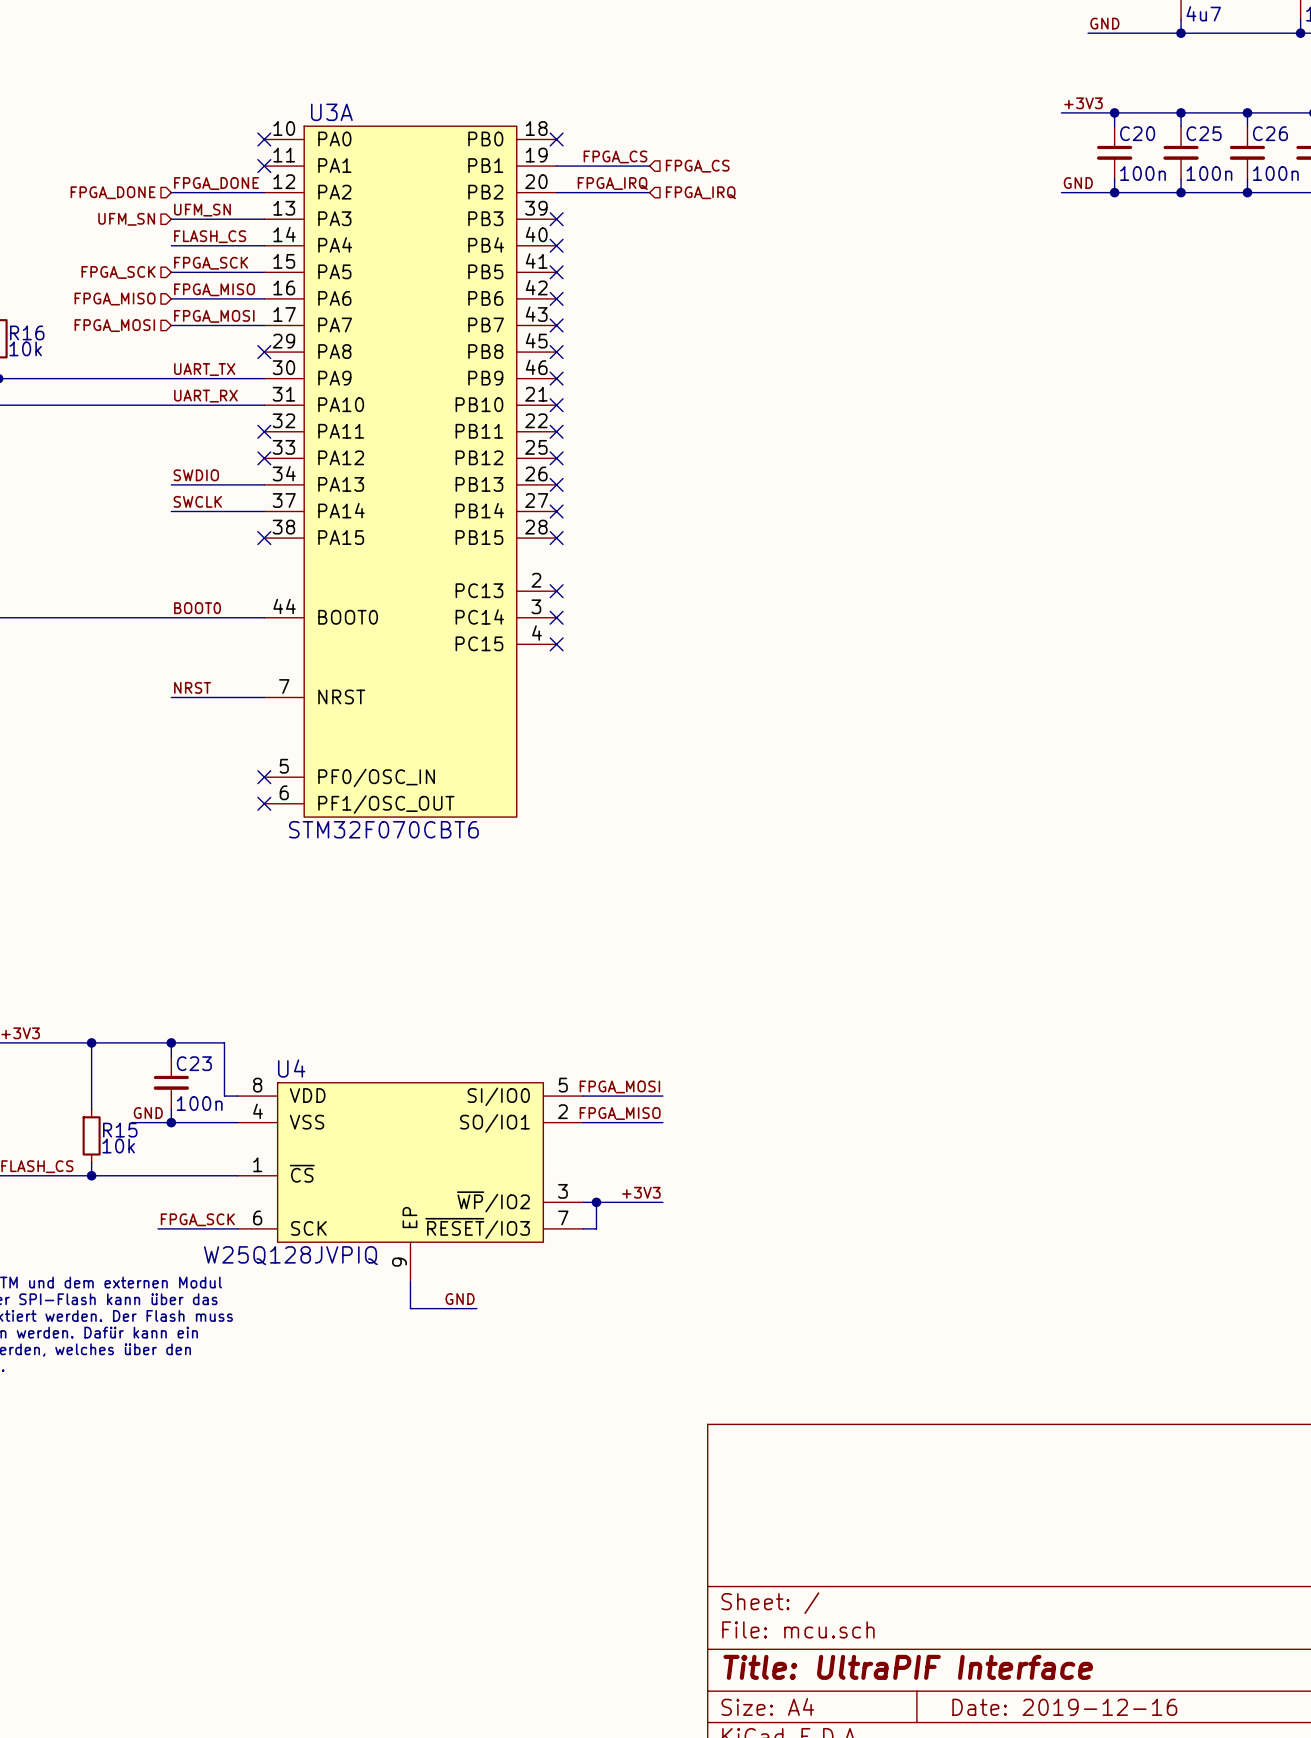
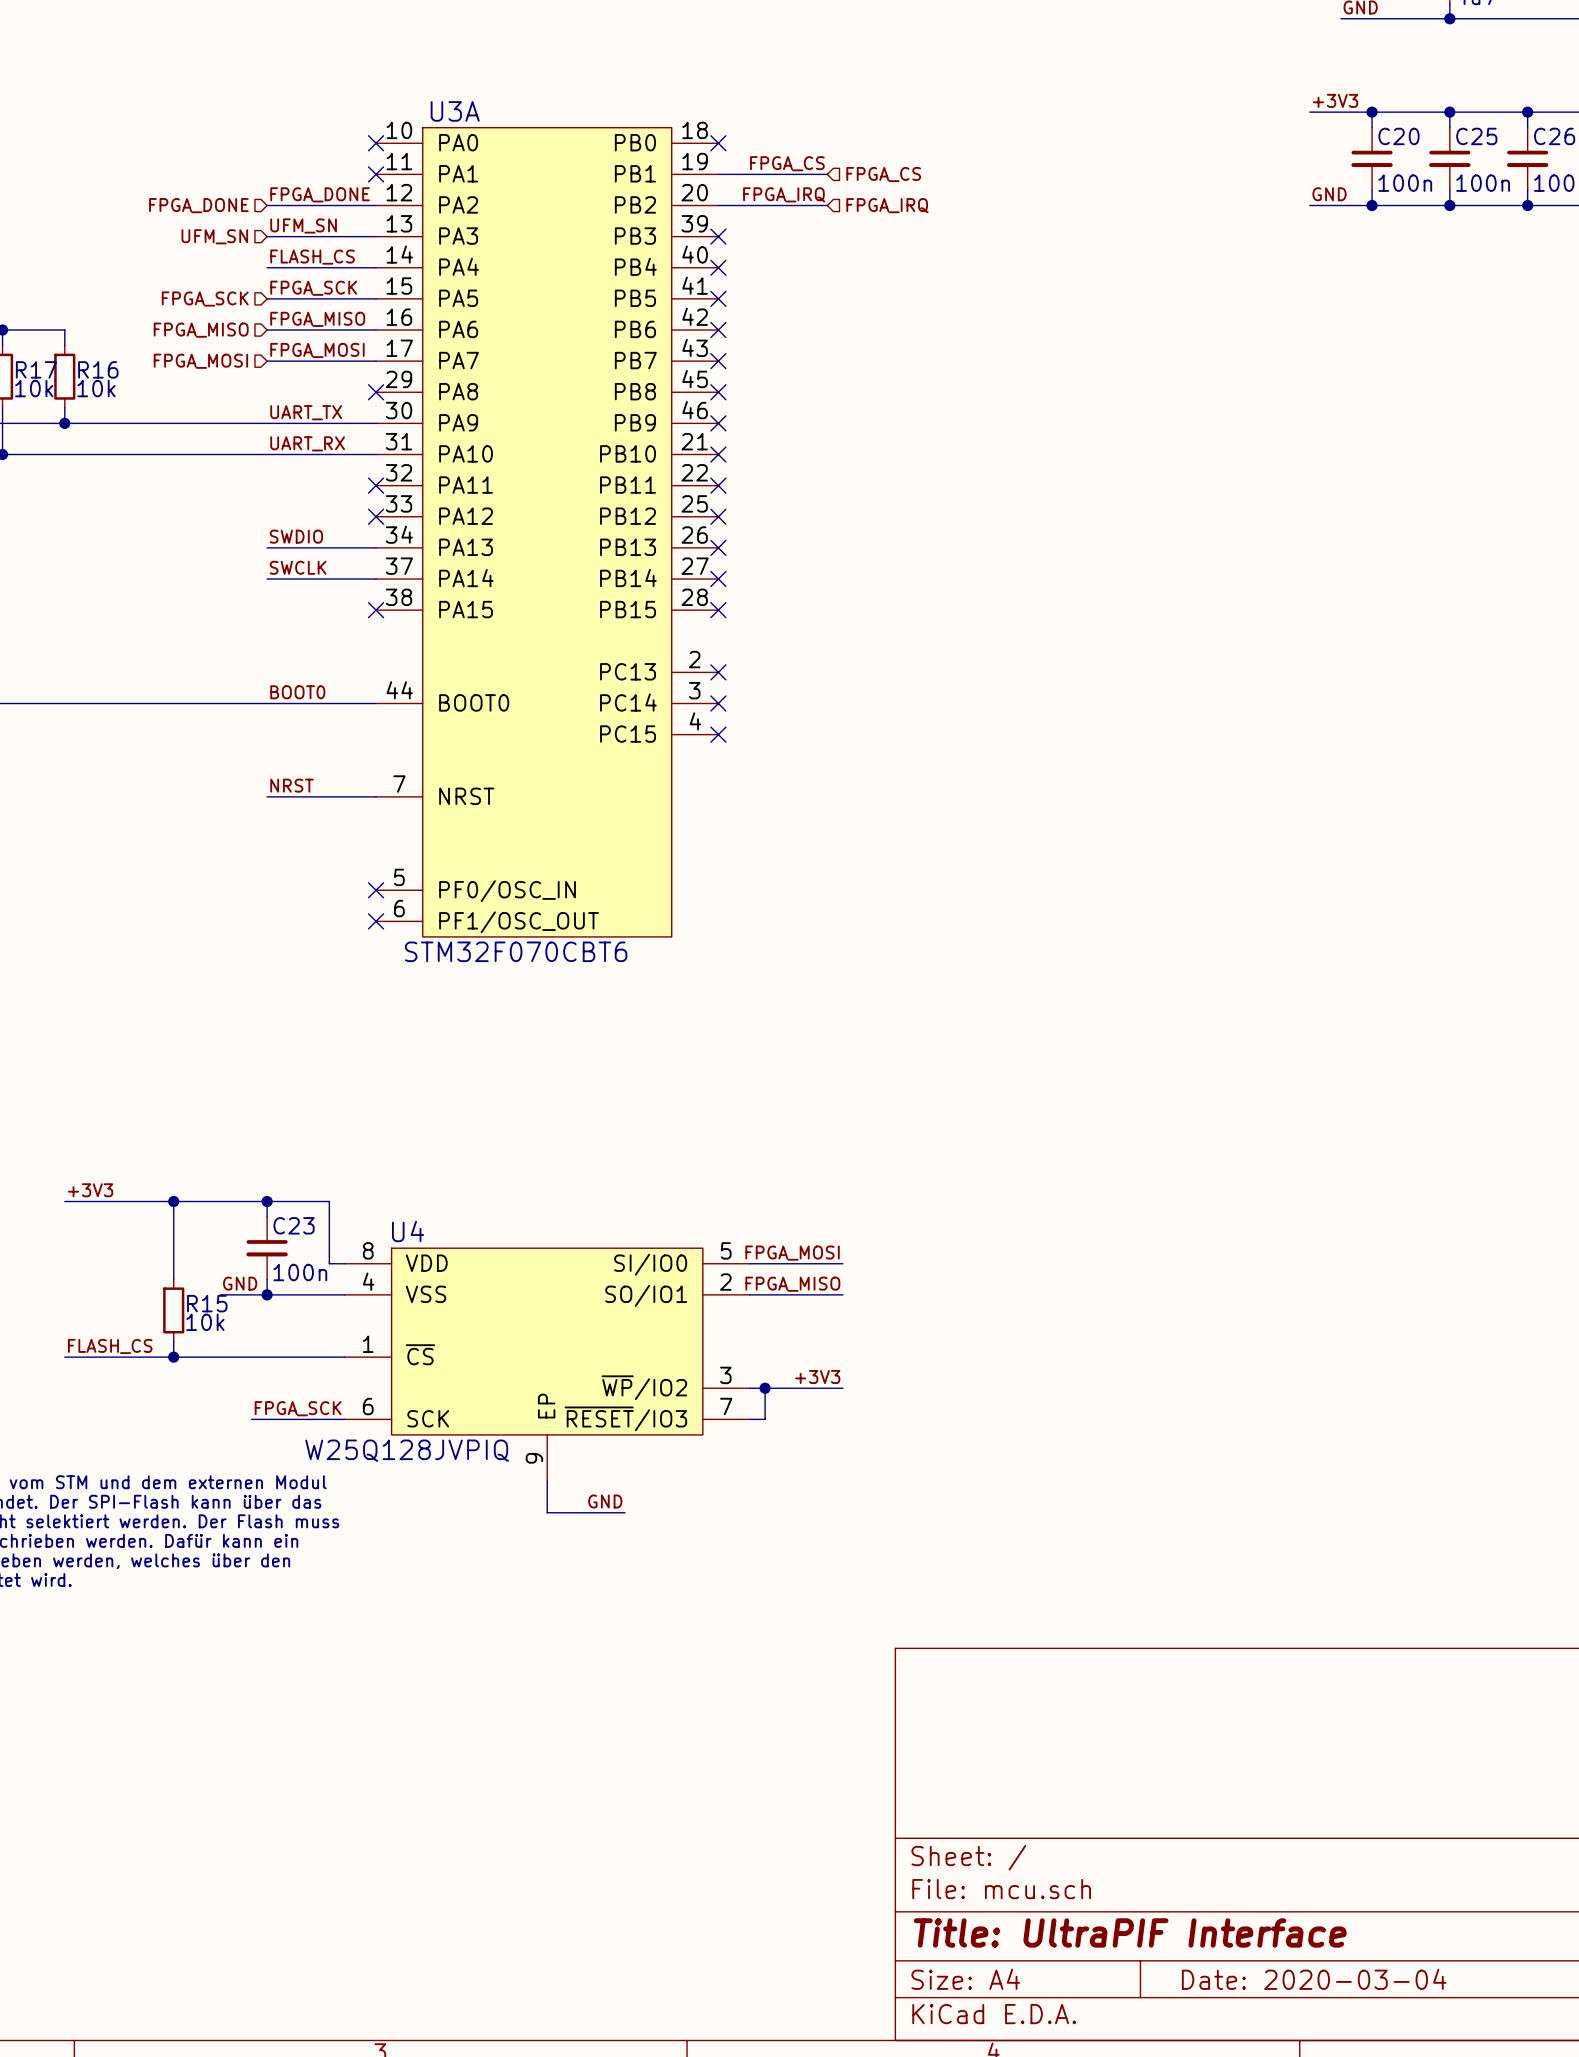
title block: Date: 2019-12-16 (1064, 1707) -> Date: 2020-03-04 (1314, 1979)

